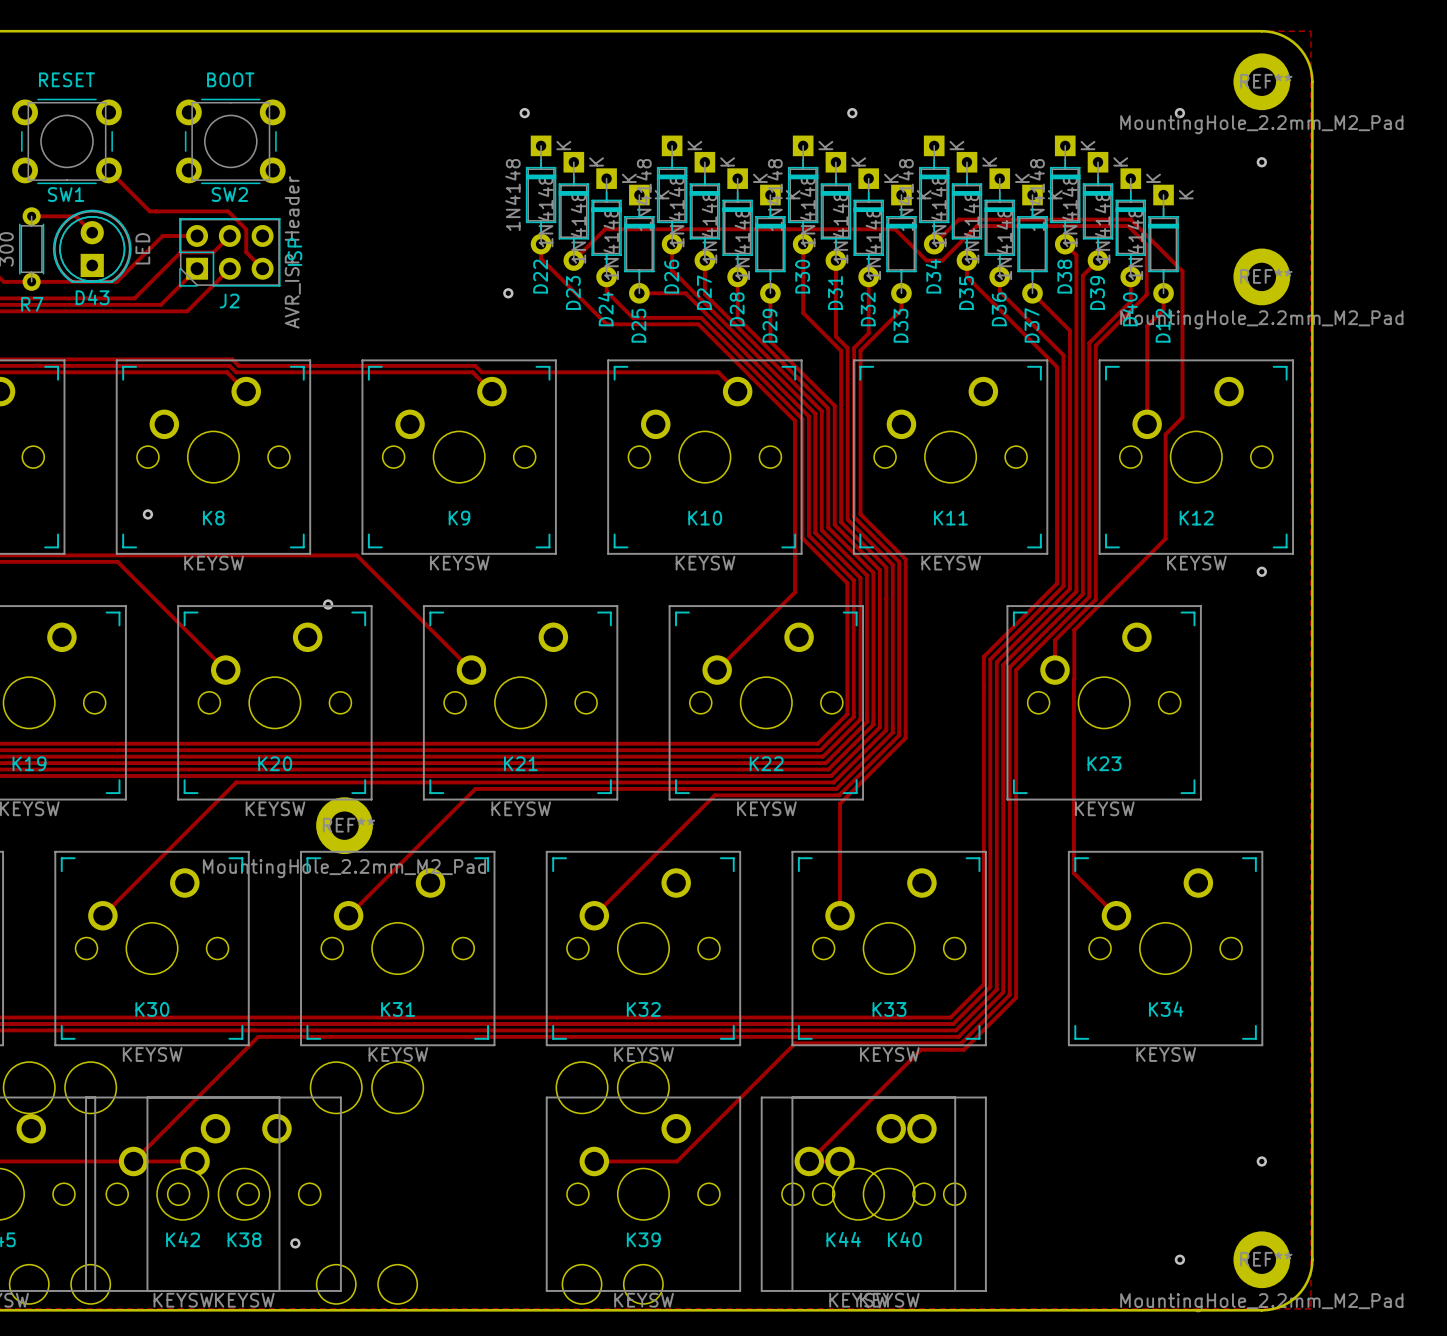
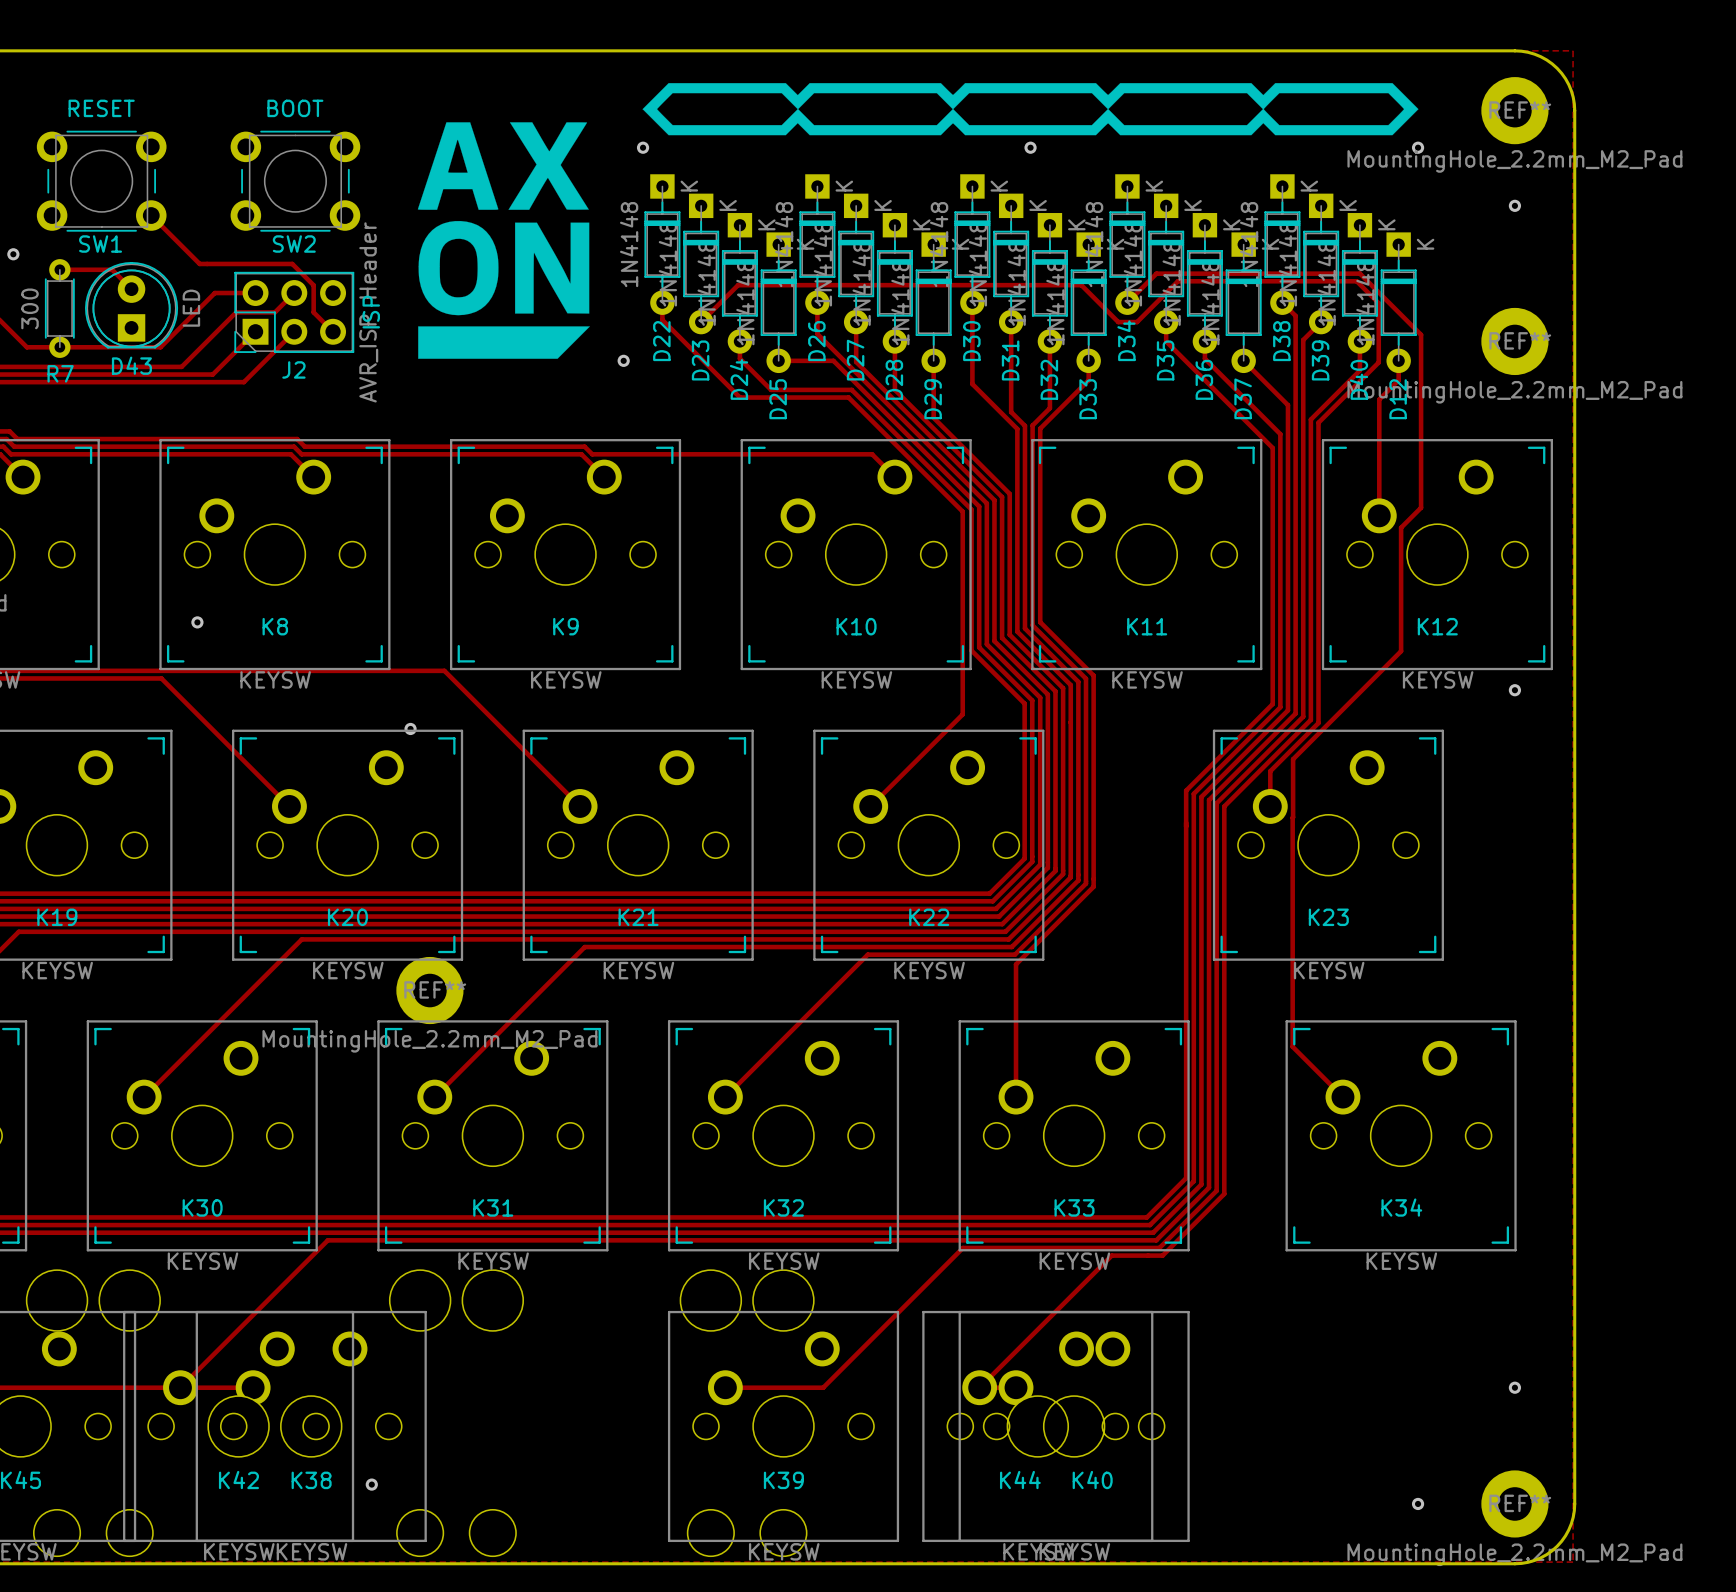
drawing: none -> [642, 83, 1419, 136]
drawing: none -> [417, 122, 590, 359]

